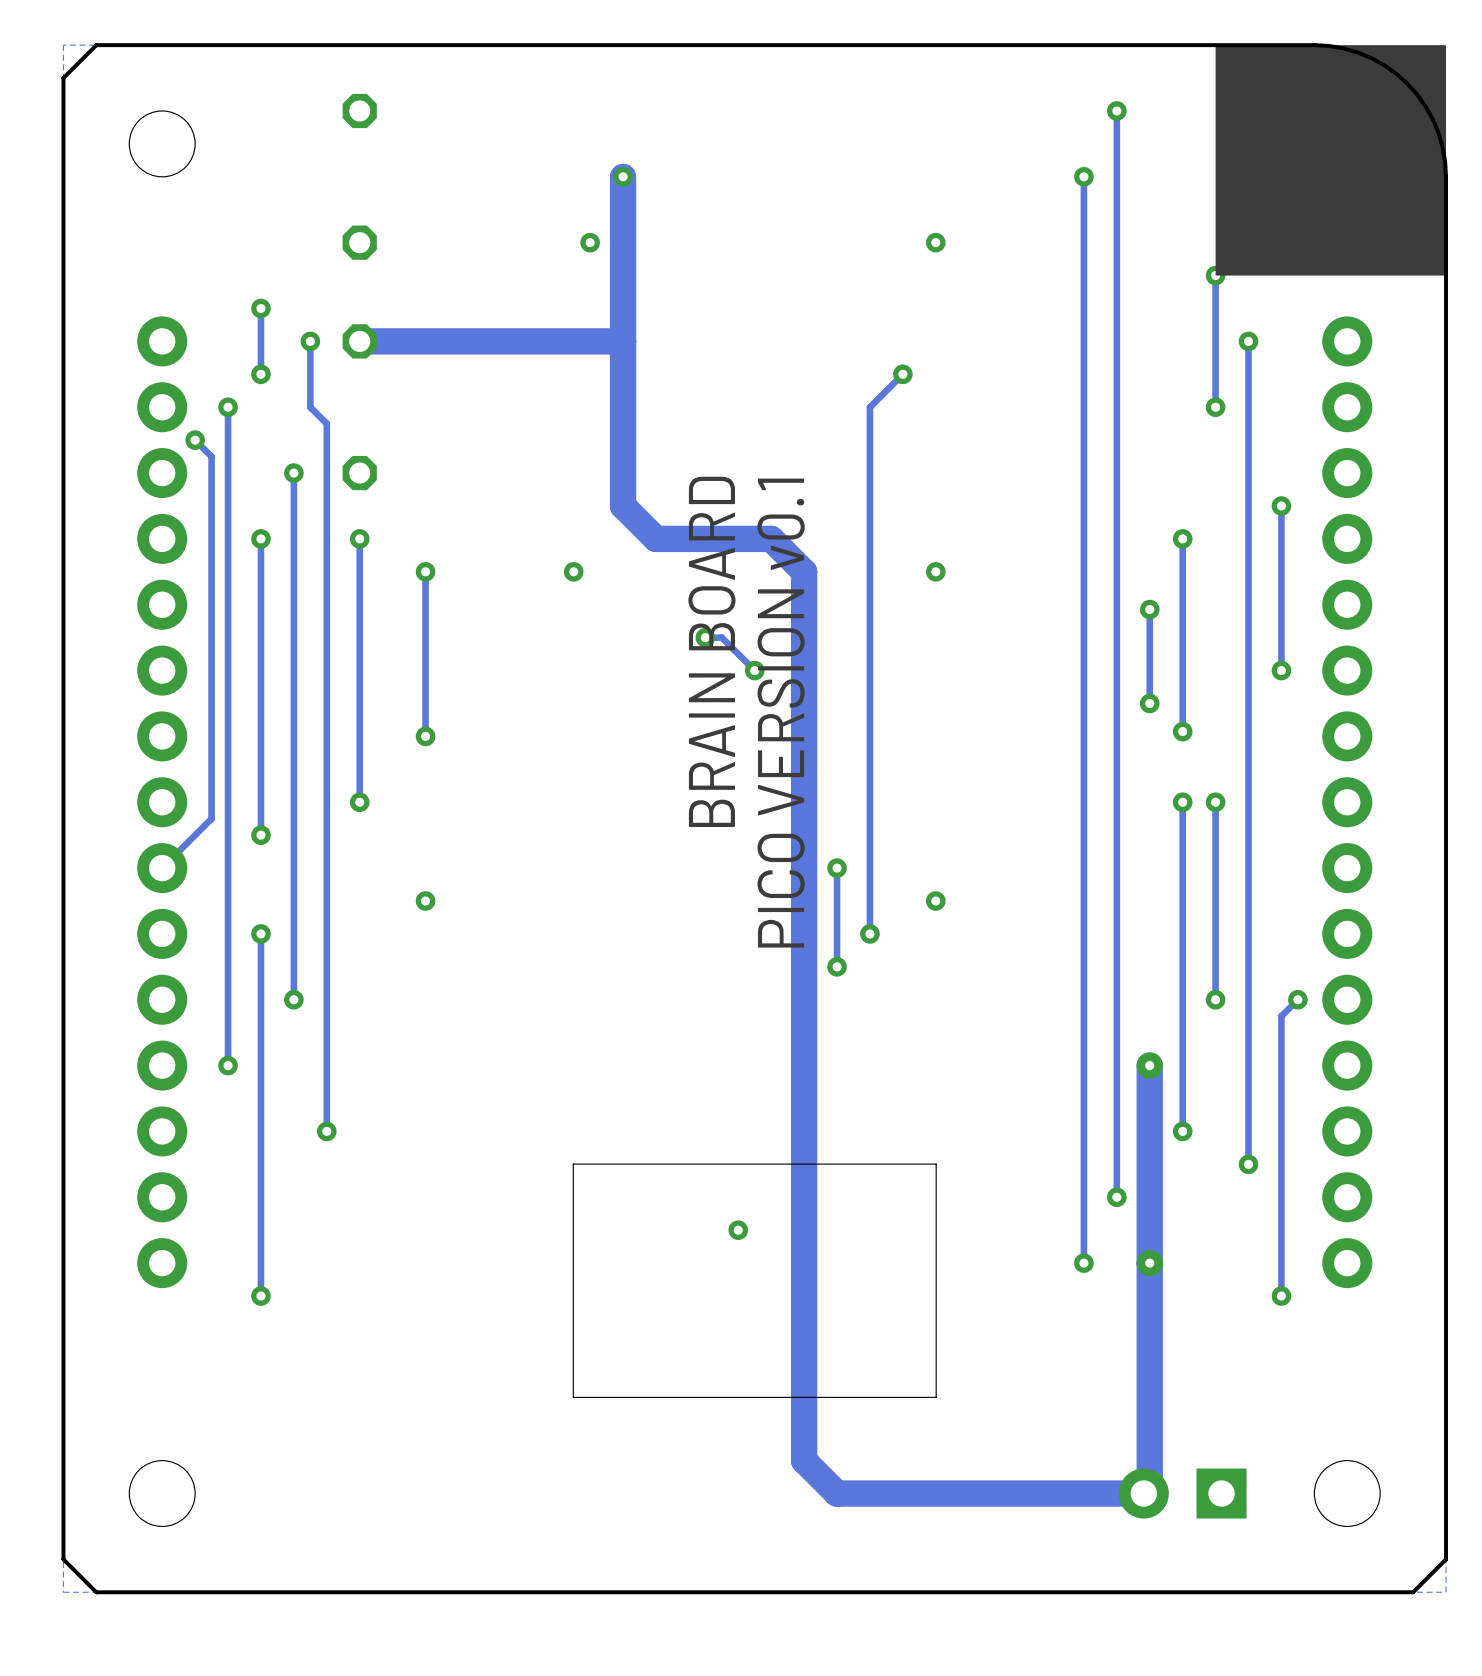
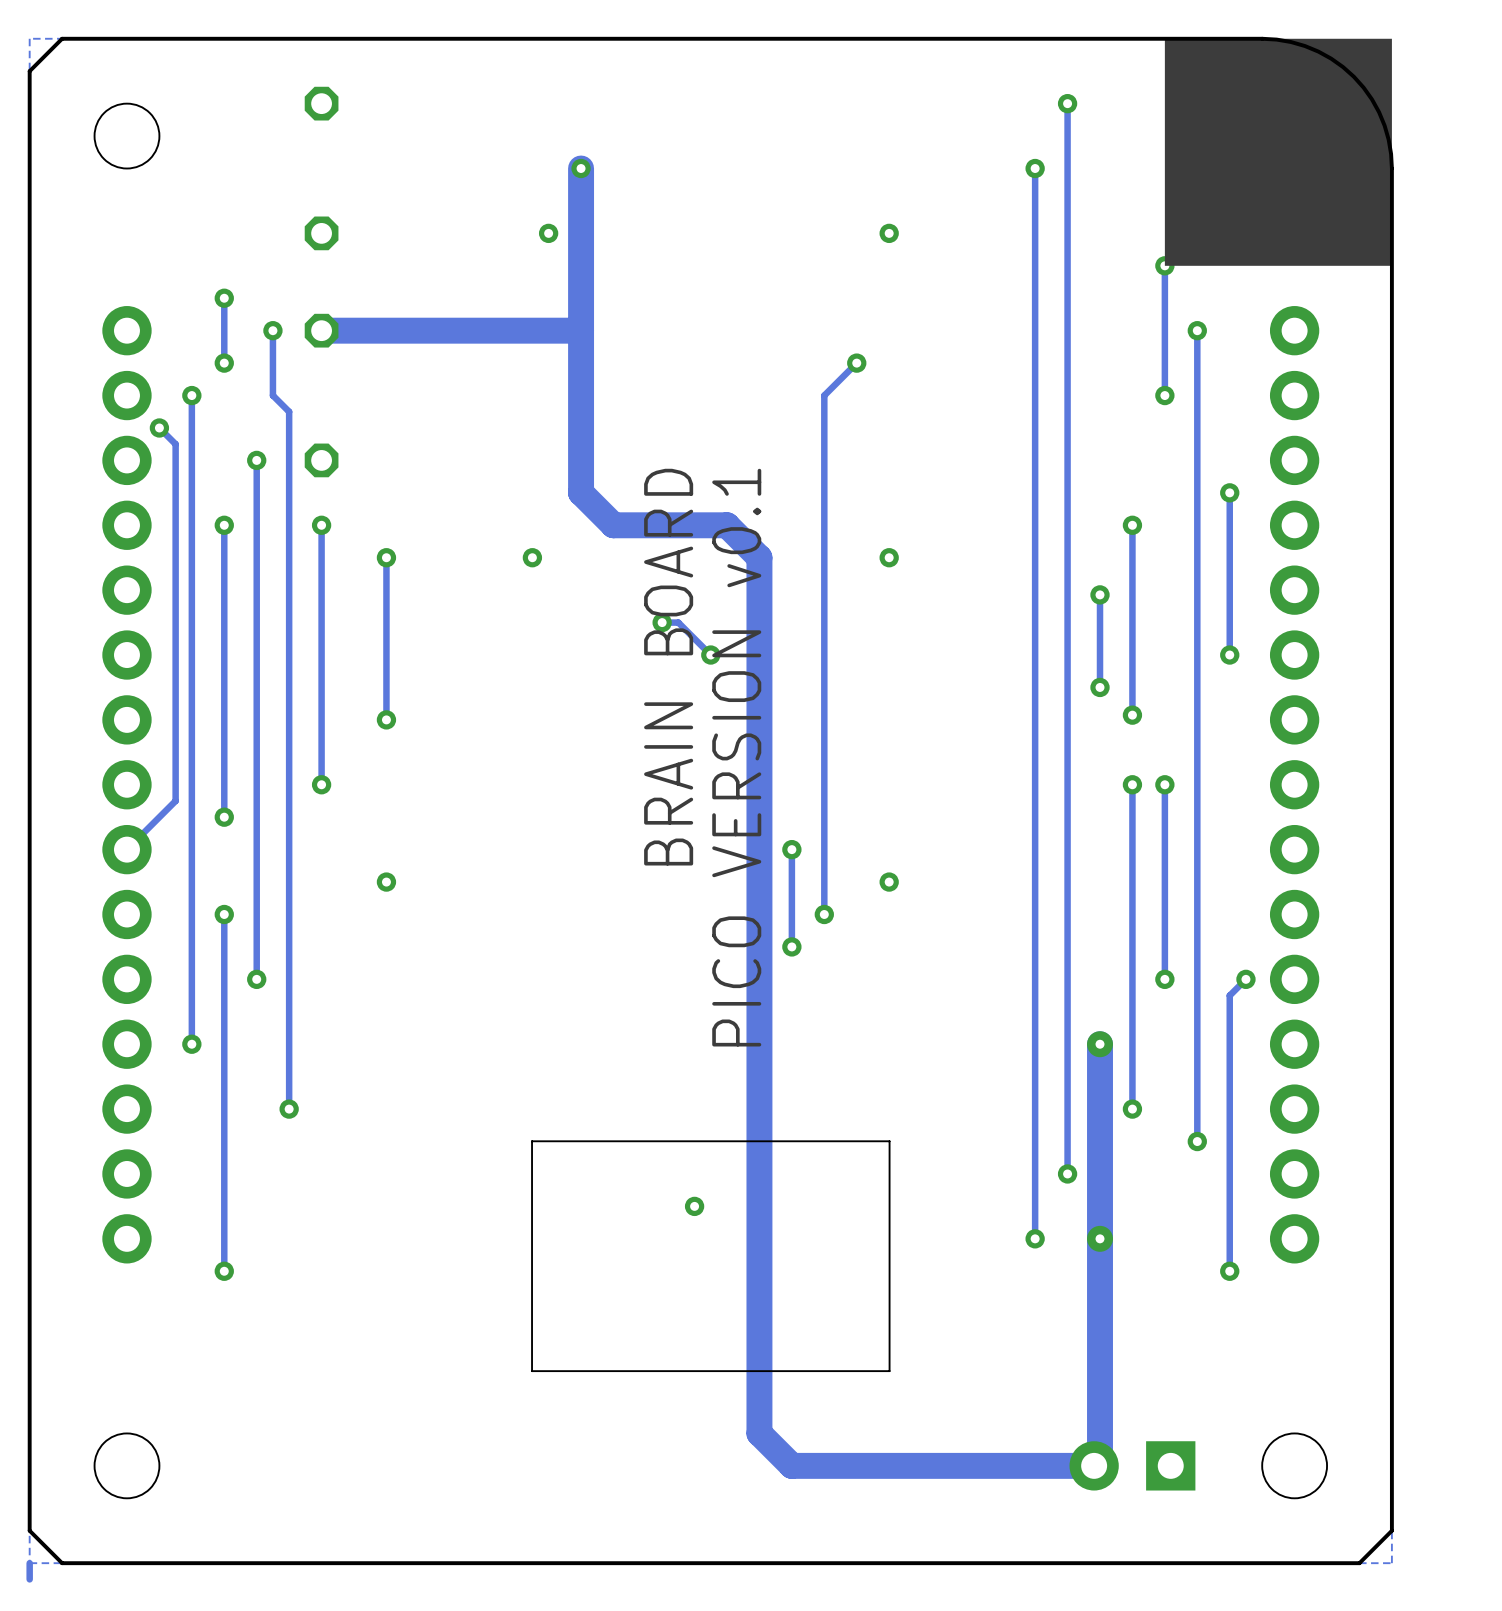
track: none -> (29, 1563) (29, 1579)

